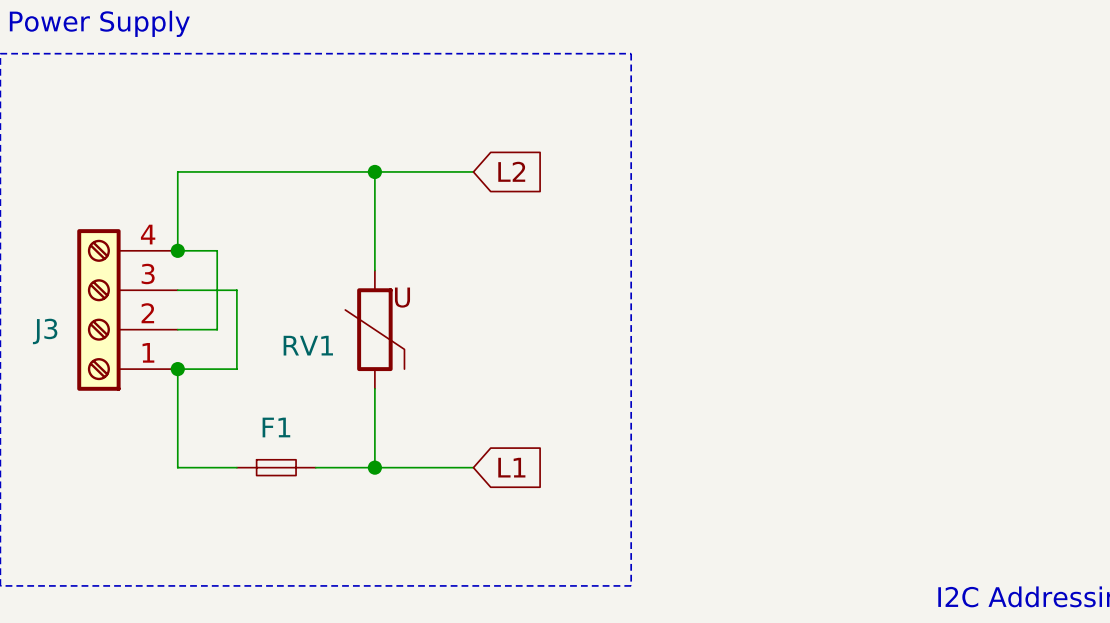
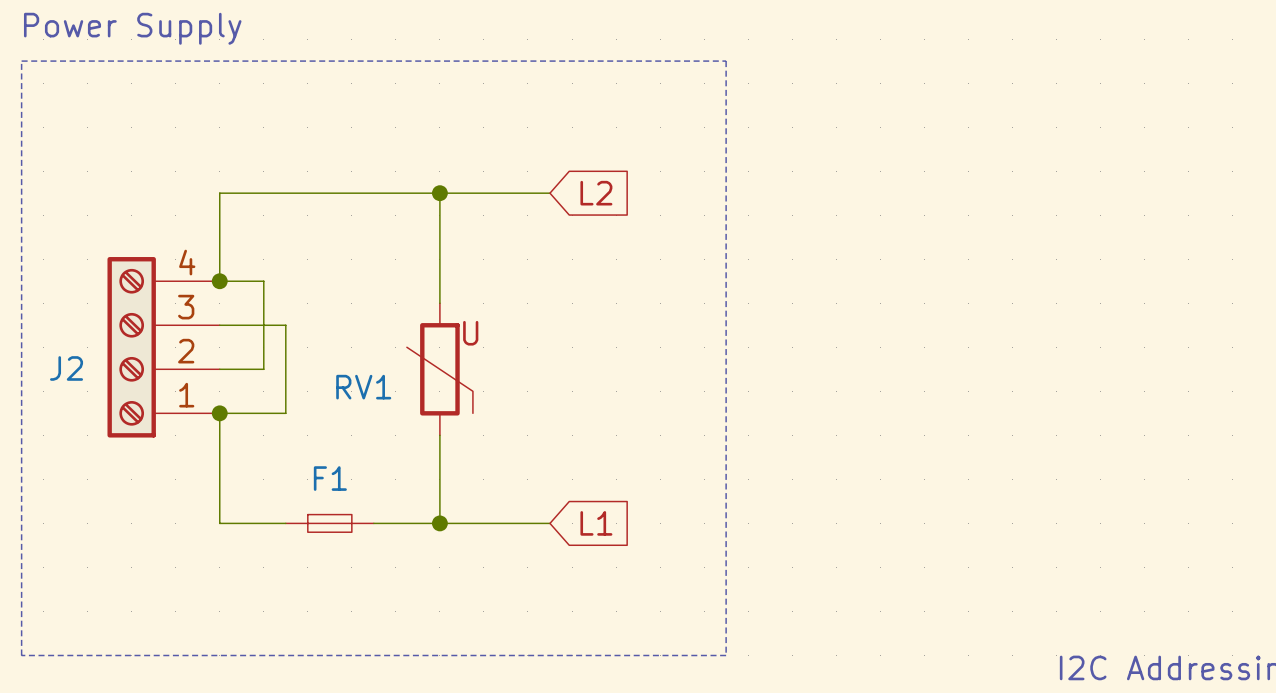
J3 name: J3 (45, 331) -> J2 (66, 368)

